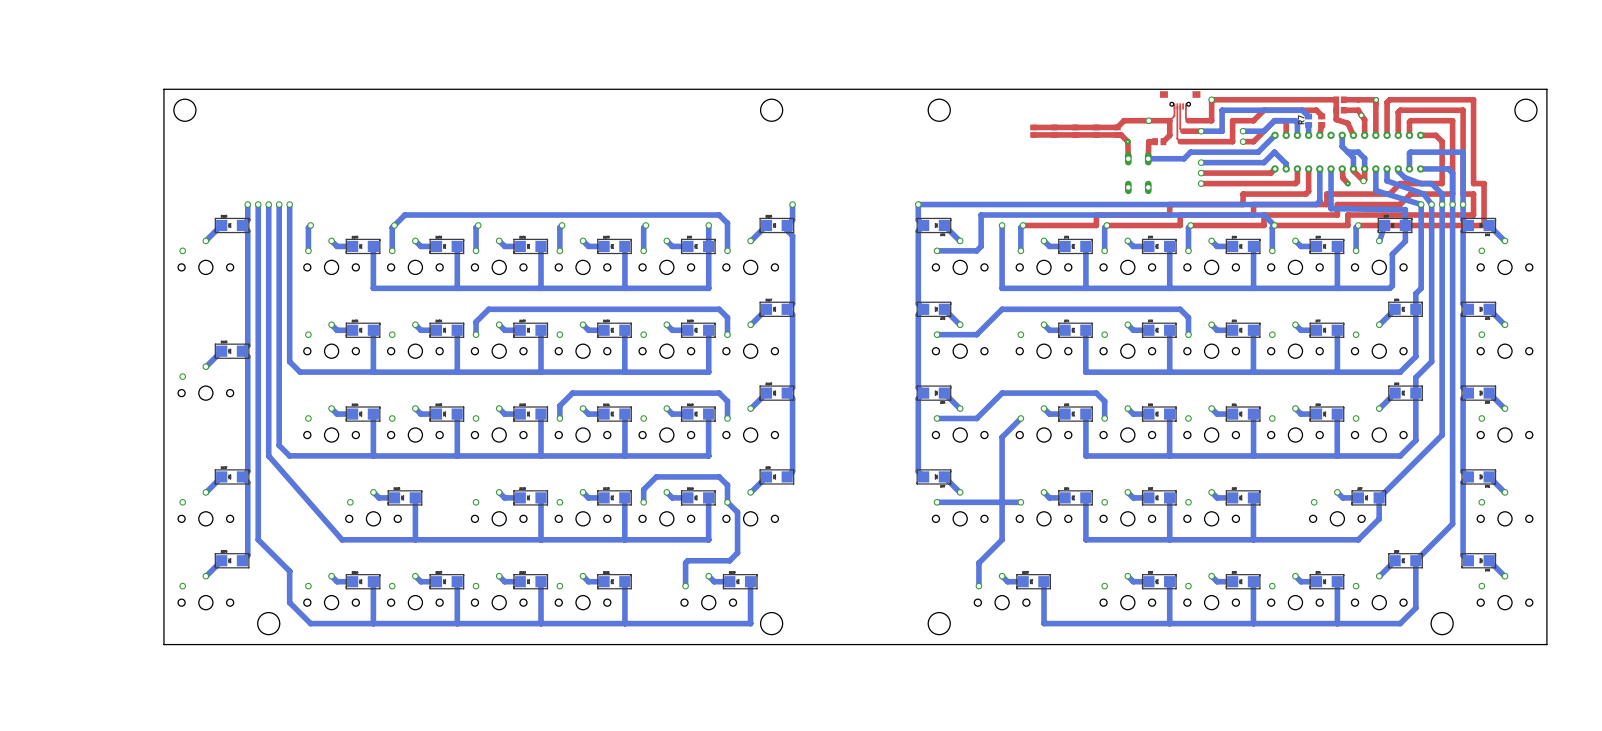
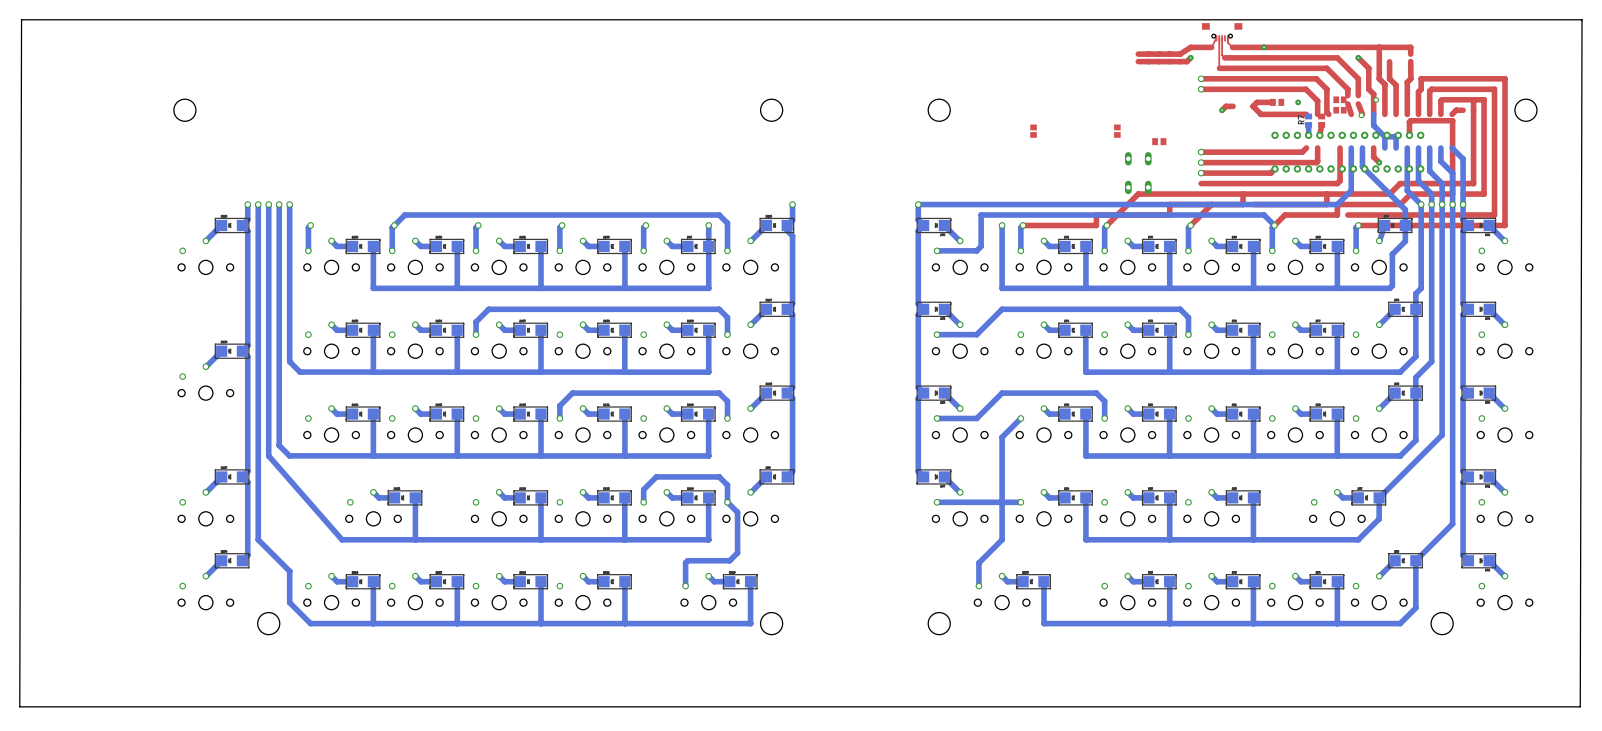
top track: none -> (1216, 38) (1211, 47) (1190, 47) (1180, 54) (1138, 54)
top track: none -> (1219, 38) (1219, 68) (1326, 68) (1347, 89) (1347, 95)
top track: none -> (1222, 38) (1222, 55) (1224, 57) (1337, 57) (1358, 78) (1358, 95)
top track: none -> (1227, 38) (1227, 42) (1232, 47) (1410, 47) (1410, 54)
via: none -> (1264, 47)
top track: none -> (1379, 47) (1379, 78) (1384, 84) (1384, 114)
top track: none -> (1190, 57) (1186, 61) (1138, 61)
via: none -> (1190, 57)
top track: none -> (1358, 57) (1368, 68) (1368, 89) (1373, 94) (1373, 114)
via: none -> (1358, 57)
top track: none -> (1389, 61) (1389, 78) (1396, 85) (1396, 114)
top track: none -> (1410, 61) (1410, 78) (1407, 82) (1407, 114)
top track: none -> (1201, 78) (1316, 78) (1326, 89) (1326, 112) (1328, 114)
via: none -> (1201, 78)
top track: none -> (1201, 89) (1305, 89) (1317, 101) (1317, 114)
via: none -> (1201, 89)
board edge: (1546, 89) (163, 89) (163, 644) (1546, 644) (1546, 89) -> (1582, 19) (1580, 706) (19, 706) (21, 19) (1582, 19)
via: (1211, 99) -> none
top track: (1343, 99) (1376, 99) (1375, 135) -> none
top track: (1442, 99) (1389, 99) (1387, 102) (1387, 135) -> (1442, 99) (1440, 114)
top track: none -> (1473, 99) (1484, 99) (1484, 183)
part position: (1180, 100) -> (1222, 32)
top track: none -> (1272, 102) (1257, 102) (1253, 106) (1261, 114) (1306, 114)
part: none -> (1277, 102)
via: none -> (1298, 102)
top track: none -> (1347, 103) (1351, 114)
top track: none -> (1358, 103) (1362, 114)
top track: (1174, 106) (1174, 115) (1169, 120) -> none
top track: (1177, 106) (1177, 138) (1180, 141) (1232, 141) (1232, 120) (1253, 120) (1264, 110) (1316, 110) (1321, 116) -> none
top track: (1180, 106) (1180, 128) (1182, 131) (1201, 131) -> none
top track: (1185, 106) (1185, 118) (1188, 120) (1211, 120) (1211, 99) (1336, 99) (1336, 119) (1347, 123) (1353, 135) -> none
top track: none -> (1233, 106) (1225, 106) (1222, 110)
via: none -> (1222, 110)
top track: (1343, 110) (1358, 110) (1364, 119) (1364, 135) -> none
top track: (1456, 110) (1400, 110) (1398, 112) (1398, 135) -> (1456, 110) (1452, 114)
top track: (1463, 110) (1463, 194) -> none
bottom track: none -> (1373, 114) (1373, 125) (1384, 136)
top track: none -> (1429, 114) (1429, 91) (1431, 89) (1494, 89) (1494, 215) (1473, 215)
bottom track: (1308, 116) (1302, 110) (1222, 110) (1222, 131) (1201, 131) -> none
via: (1148, 120) -> none
top track: (1169, 120) (1124, 120) (1117, 127) (1033, 127) -> none
top track: (1169, 120) (1169, 135) (1163, 141) -> none
via: (1201, 131) -> none
bottom track: (1243, 131) (1264, 131) (1274, 120) (1295, 120) (1297, 122) (1297, 135) -> none
via: (1243, 131) -> none
top track: (1033, 134) (1121, 134) (1127, 141) (1128, 158) -> none
bottom track: (1275, 135) (1258, 152) (1190, 152) (1184, 158) (1148, 158) -> none
top track: (1286, 135) (1286, 121) (1274, 120) (1253, 141) (1243, 141) -> none
bottom track: (1342, 135) (1342, 146) (1353, 157) (1353, 168) -> none
top track: (1420, 135) (1435, 135) (1442, 141) (1442, 183) -> none
bottom track: none -> (1384, 136) (1384, 148)
bottom track: none -> (1384, 136) (1394, 136) (1396, 148)
via: (1127, 141) -> none
top track: (1155, 141) (1148, 141) (1148, 158) -> none
via: (1243, 141) -> none
top track: none -> (1306, 148) (1302, 152) (1201, 152)
top track: none -> (1317, 148) (1316, 162) (1201, 162)
top track: none -> (1373, 148) (1373, 157) (1379, 162)
via: none -> (1201, 152)
bottom track: (1347, 152) (1358, 152) (1364, 158) (1364, 168) -> none
bottom track: (1463, 158) (1463, 152) (1410, 152) (1409, 168) -> (1463, 158) (1452, 148)
bottom track: (1201, 162) (1264, 162) (1274, 152) (1286, 163) (1286, 168) -> none
via: none -> (1379, 162)
top track: (1297, 168) (1297, 181) (1295, 183) -> (1340, 148) (1340, 180) (1337, 183) (1295, 183)
top track: (1308, 168) (1308, 191) (1305, 194) -> (1326, 194) (1305, 194)
bottom track: (1319, 168) (1319, 201) (1316, 204) -> (1351, 148) (1351, 190) (1337, 204) (1316, 204)
bottom track: (1331, 168) (1331, 208) (1405, 209) -> (1362, 148) (1362, 166) (1405, 209)
top track: (1342, 168) (1342, 177) (1347, 183) -> none
top track: (1364, 168) (1363, 180) (1353, 168) -> none
bottom track: (1375, 168) (1375, 190) (1421, 204) -> (1407, 148) (1407, 190) (1421, 204)
bottom track: (1387, 168) (1387, 180) (1423, 194) (1431, 204) -> (1418, 148) (1418, 180) (1431, 194) (1431, 204)
bottom track: (1398, 168) (1404, 177) (1421, 183) (1431, 183) (1442, 194) -> (1429, 148) (1429, 171) (1442, 183) (1442, 194)
bottom track: (1448, 168) (1420, 168) -> (1448, 168) (1440, 161) (1440, 148)
via: (1363, 180) -> none
via: (1201, 183) -> none
via: (1347, 183) -> none
top track: (1484, 183) (1473, 183) -> (1442, 183) (1473, 183)
top track: (1473, 194) (1473, 215) -> (1473, 194) (1484, 194)
top track: (1484, 194) (1484, 225) -> (1418, 114) (1418, 91) (1421, 89) (1421, 78) (1505, 78) (1505, 225) (1484, 225)
top track: (1253, 204) (1253, 215) (1180, 215) (1180, 225) (1106, 225) -> (1243, 194) (1138, 194) (1106, 225)
top track: (1284, 215) (1264, 215) (1264, 225) (1190, 225) -> (1211, 204) (1190, 225)
top track: (1347, 215) (1347, 225) (1274, 225) -> (1284, 215) (1274, 225)

